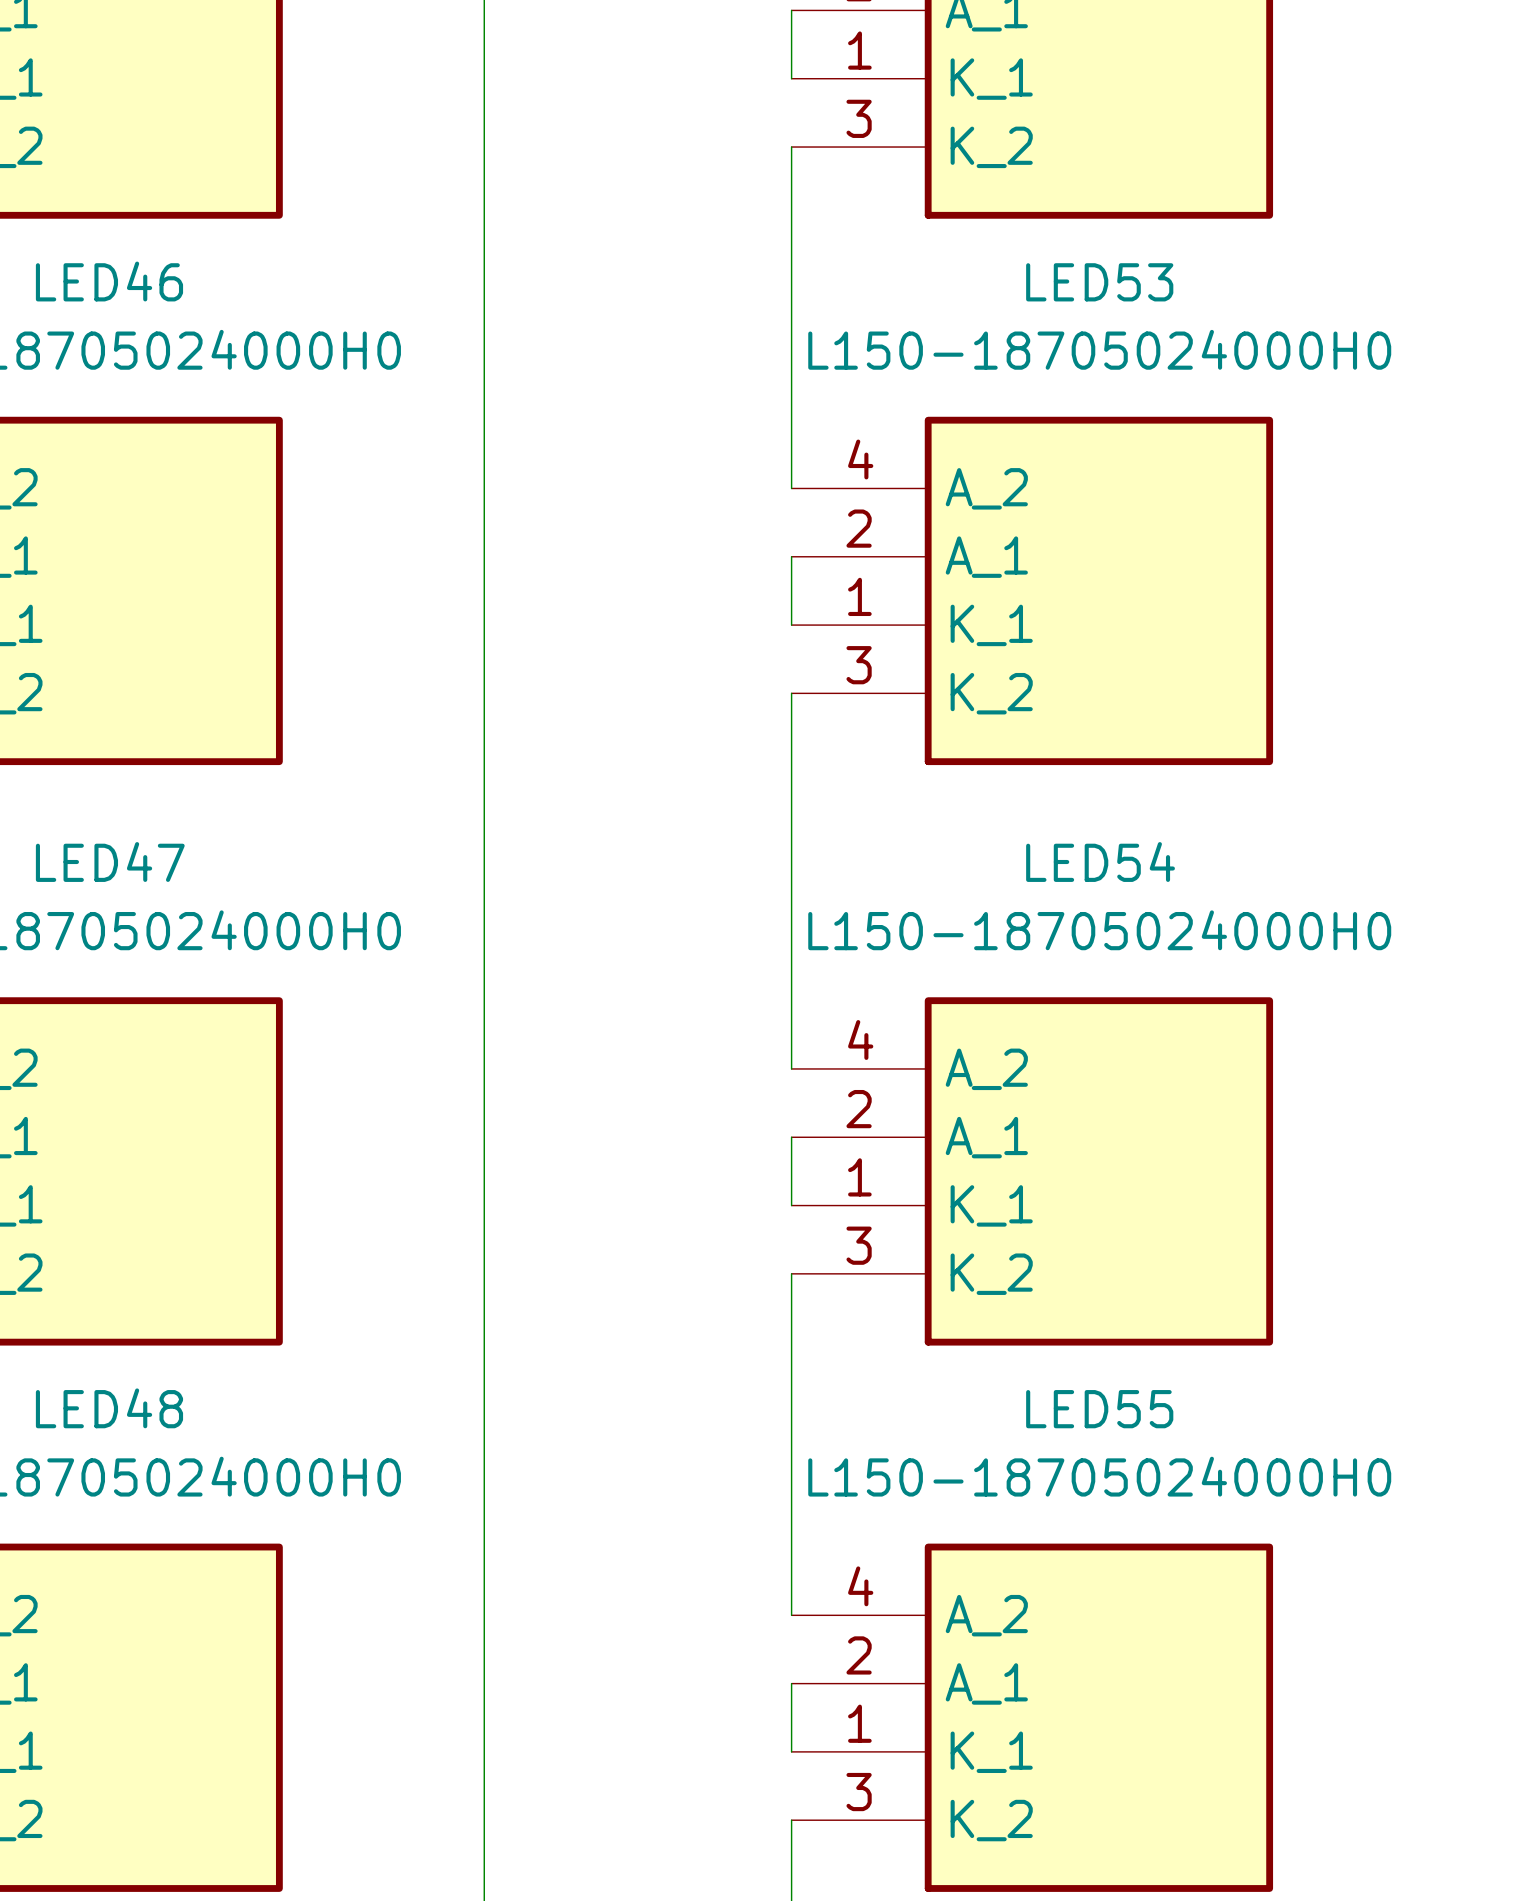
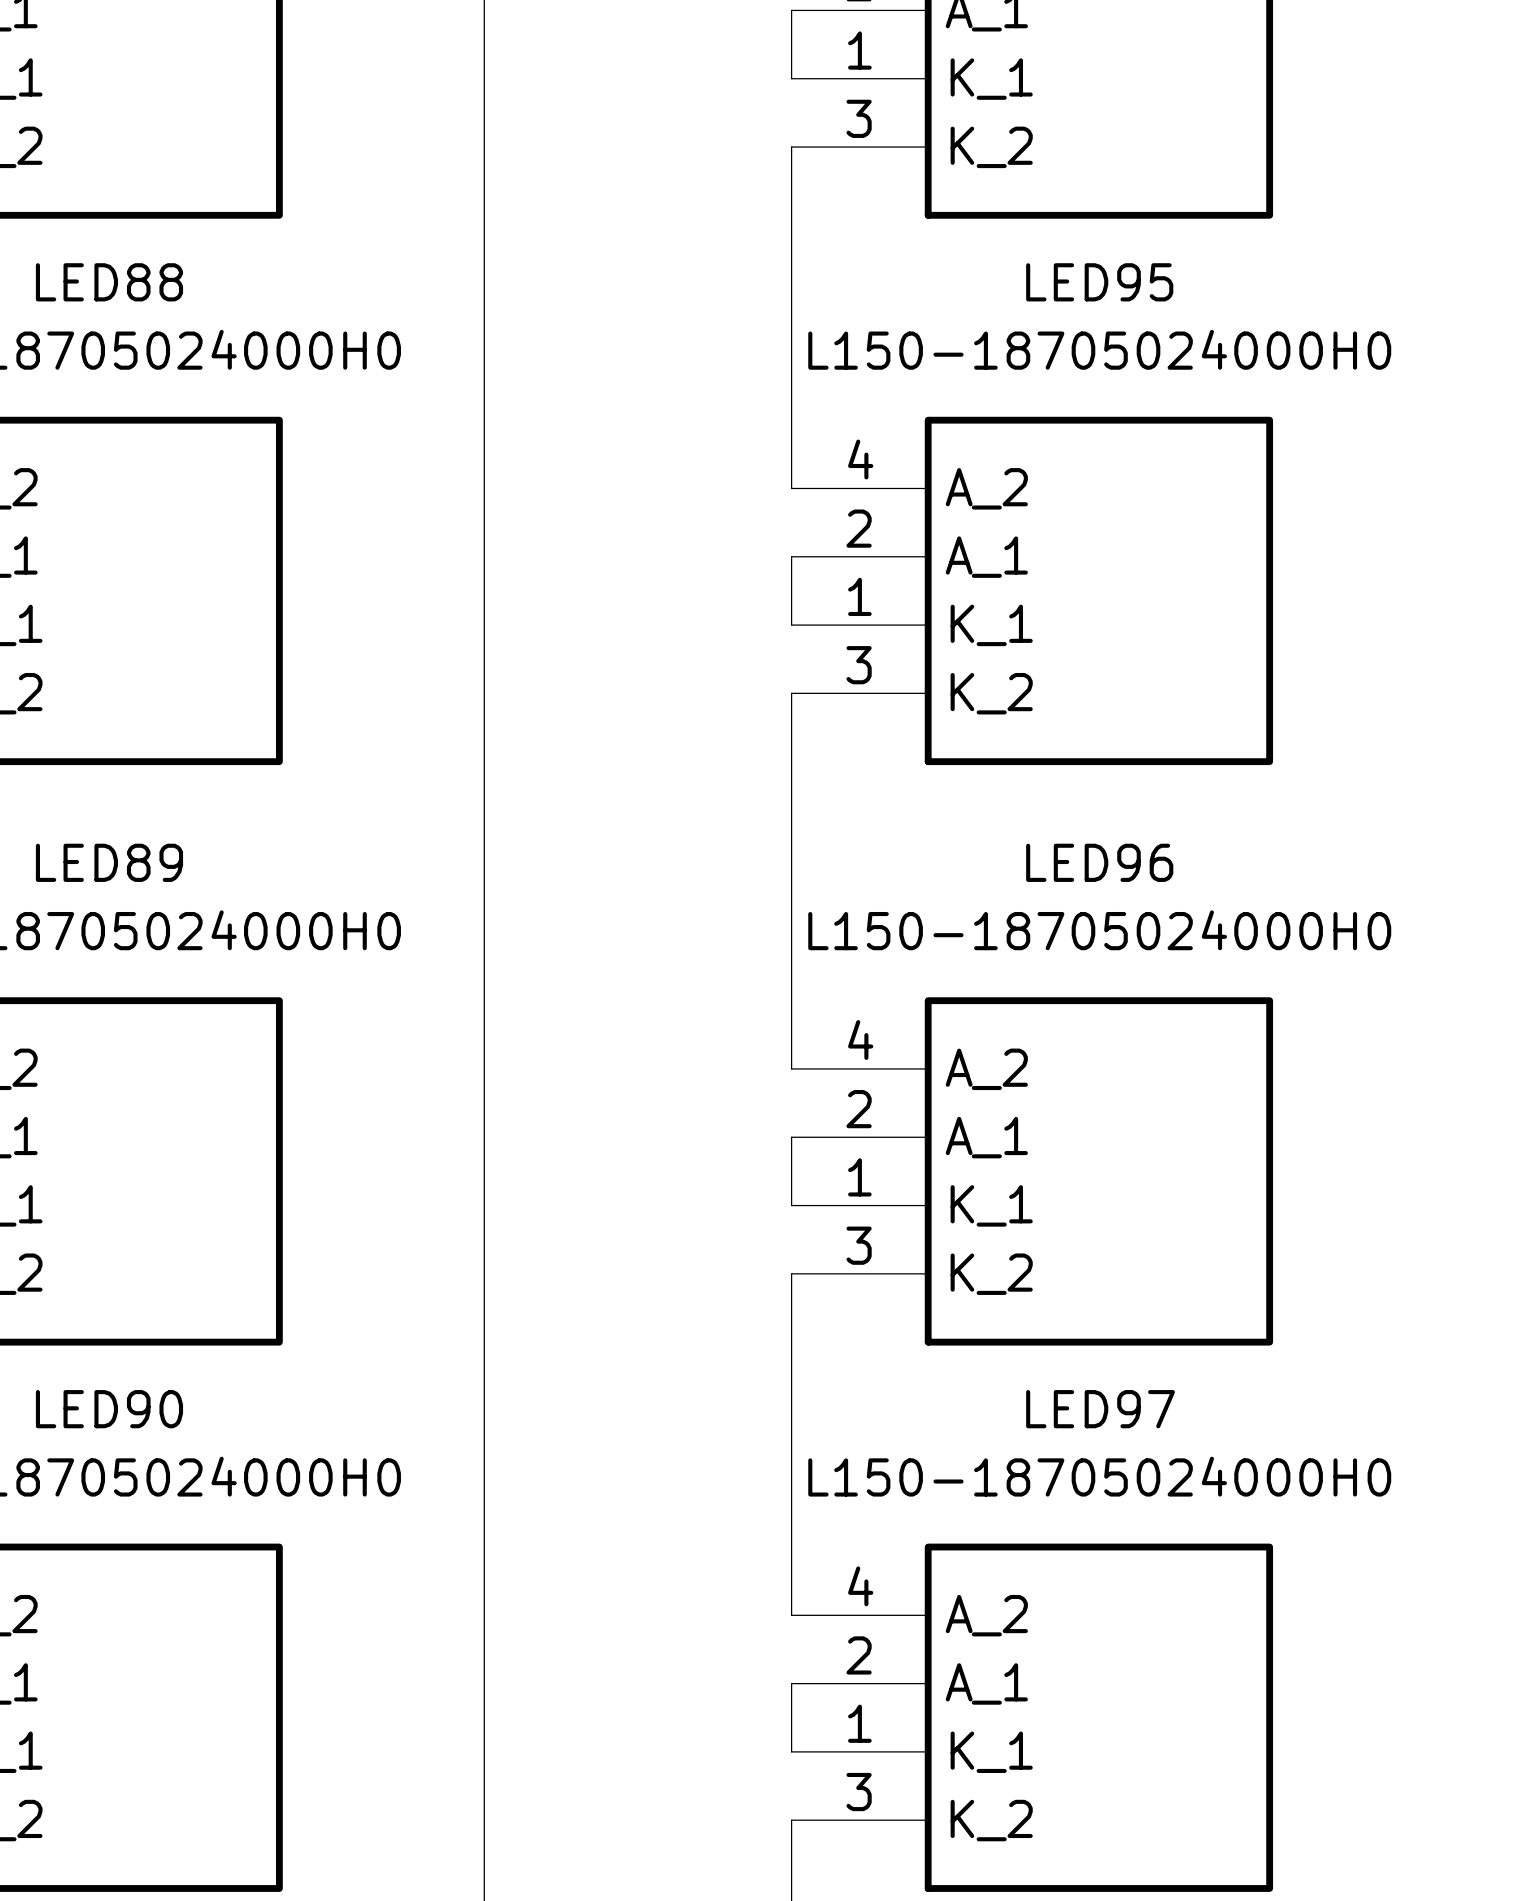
LED46 name: LED46 (109, 281) -> LED88 (109, 282)
LED53 name: LED53 (1099, 282) -> LED95 (1099, 282)
LED47 name: LED47 (110, 862) -> LED89 (109, 862)
LED54 name: LED54 (1100, 862) -> LED96 (1099, 862)
LED48 name: LED48 (109, 1408) -> LED90 (109, 1409)
LED55 name: LED55 (1099, 1409) -> LED97 (1100, 1409)

